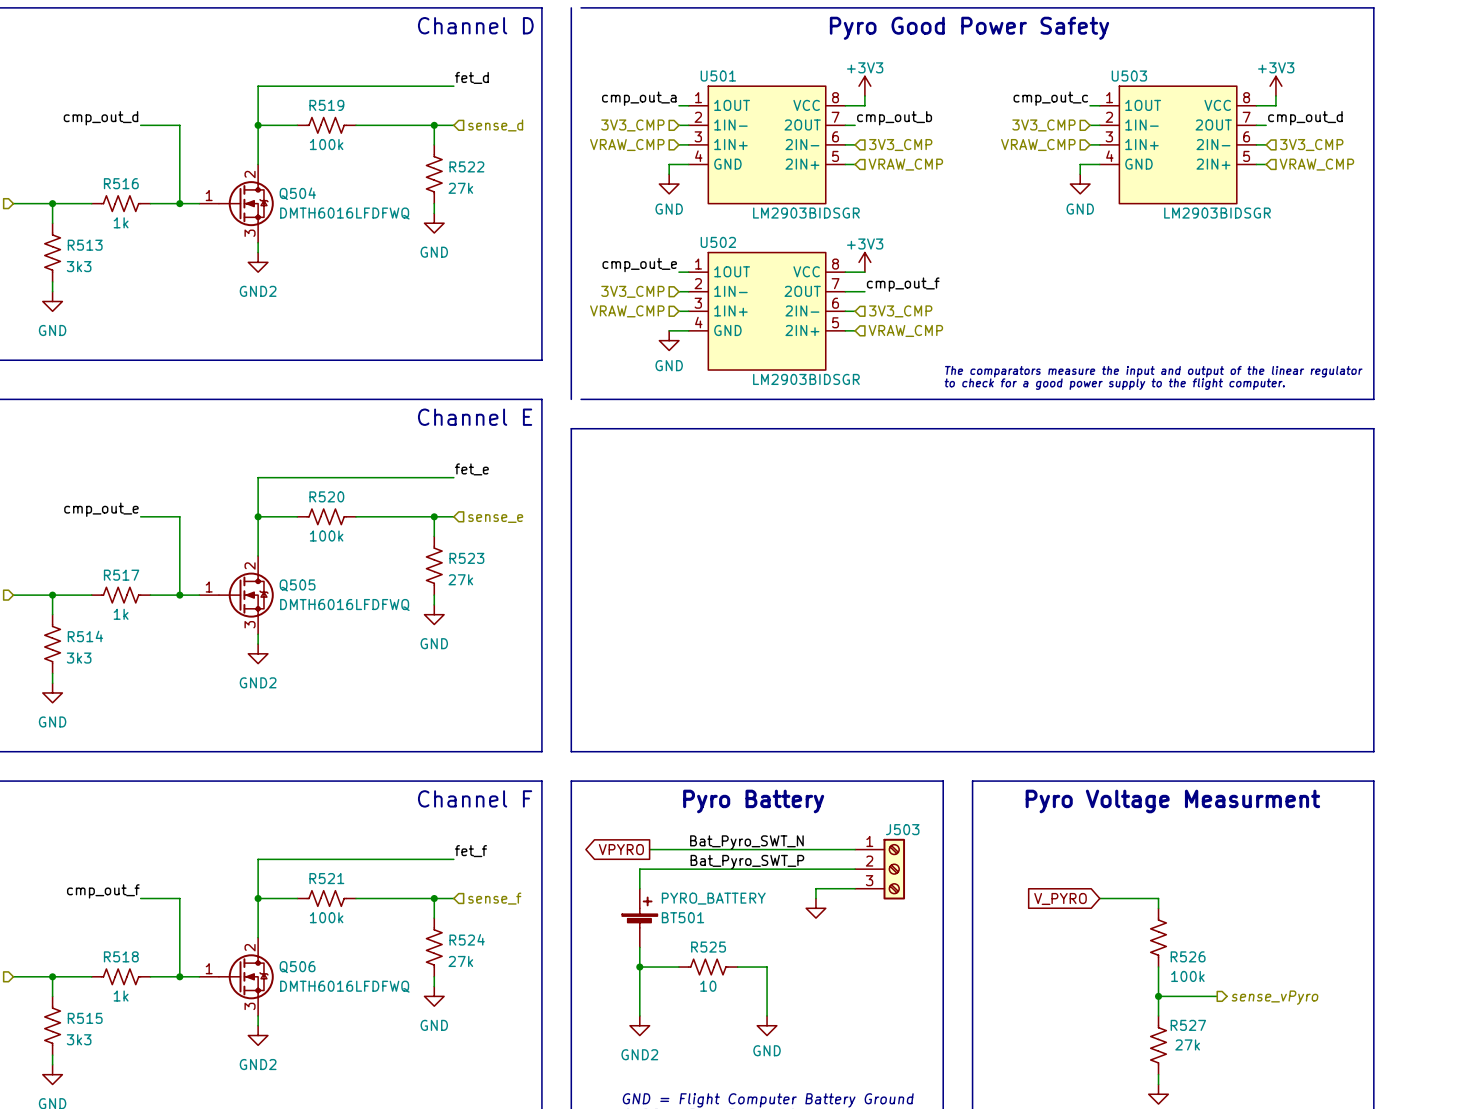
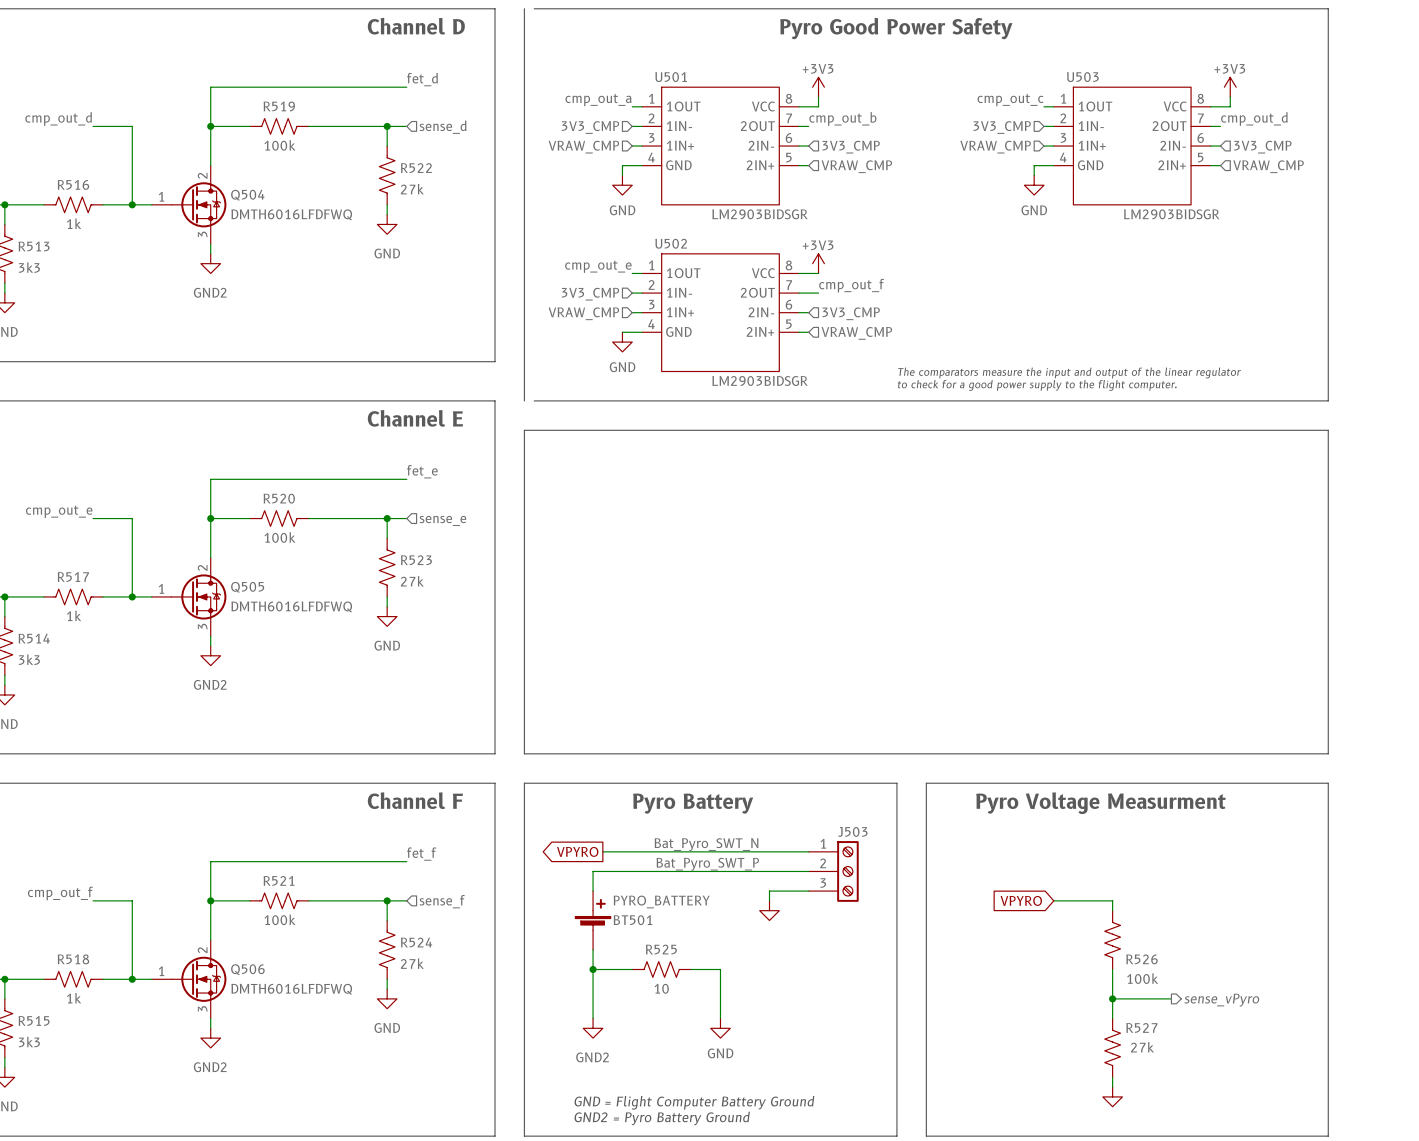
global label: V_PYRO (1060, 898) -> VPYRO (1021, 900)

